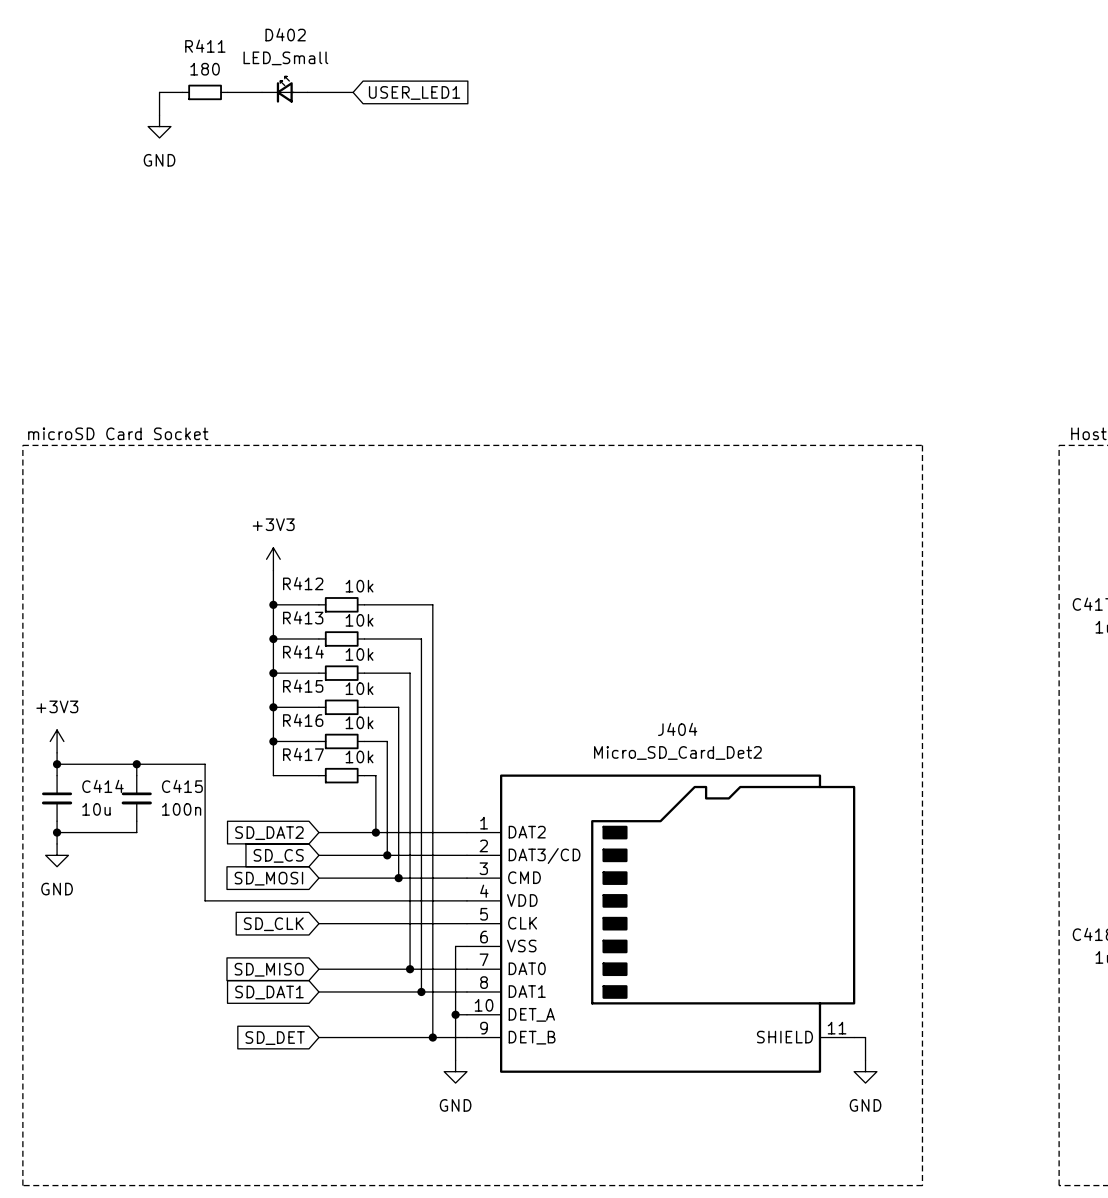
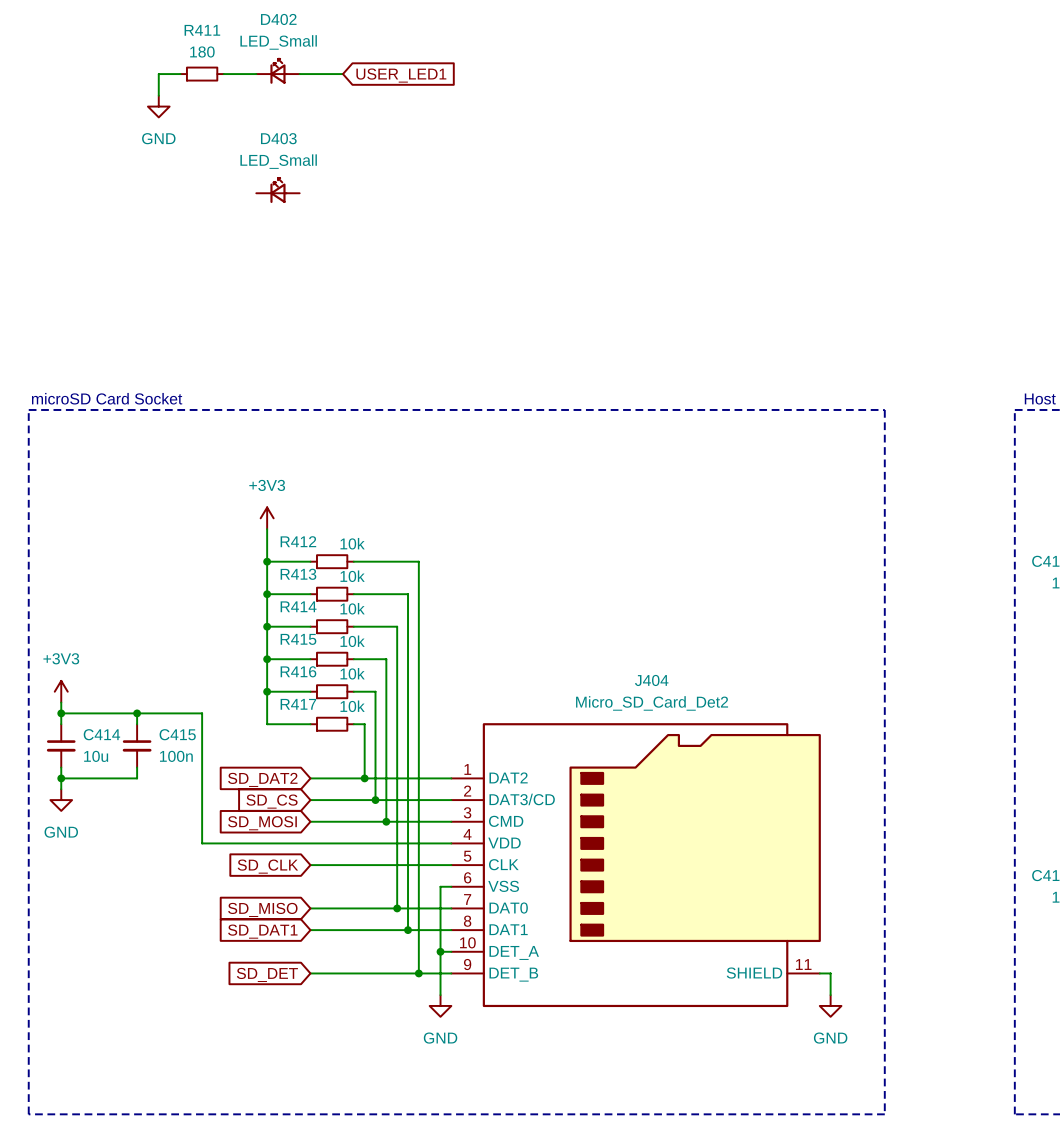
D403: none -> LED_Small (277, 190)

